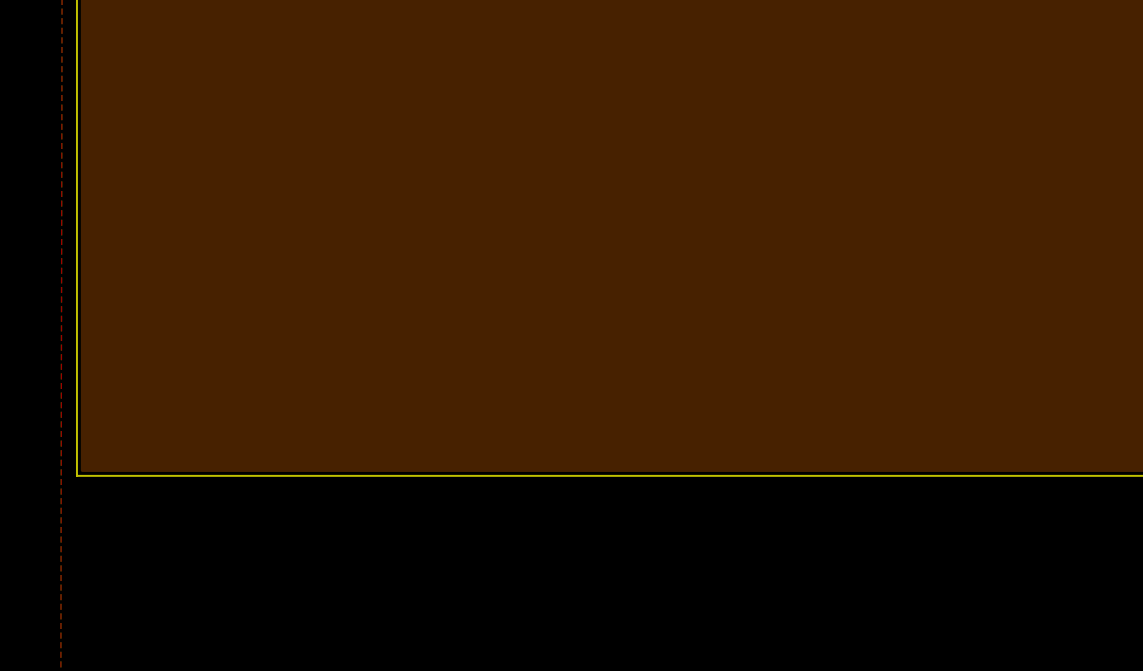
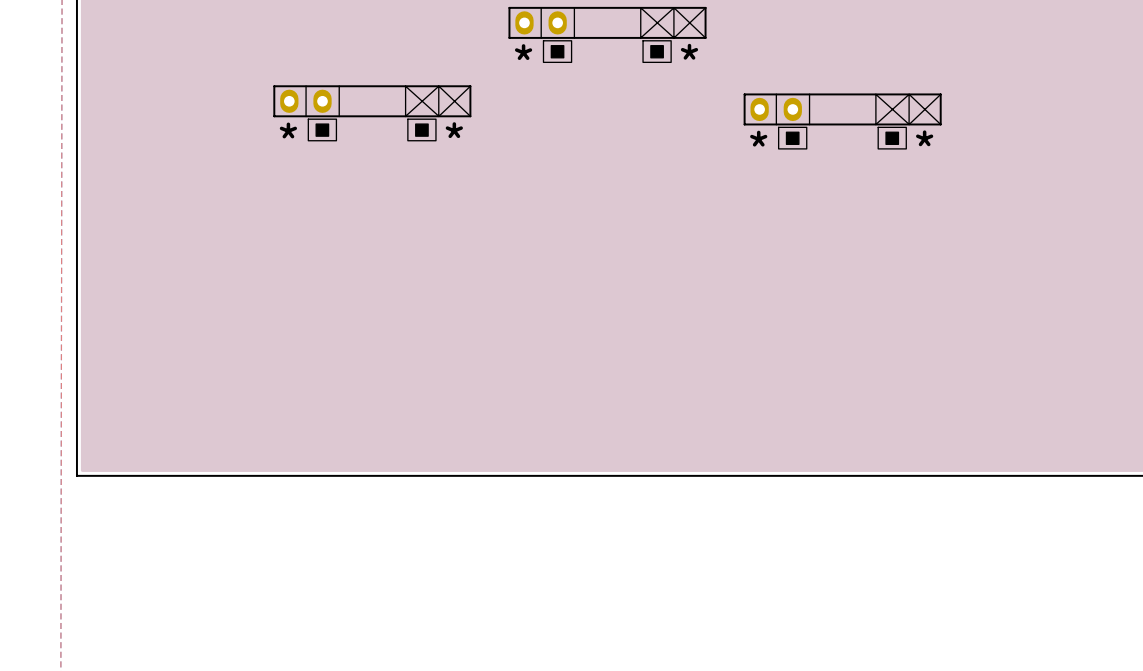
part: none -> (607, 34)
part: none -> (372, 113)
part: none -> (842, 121)

